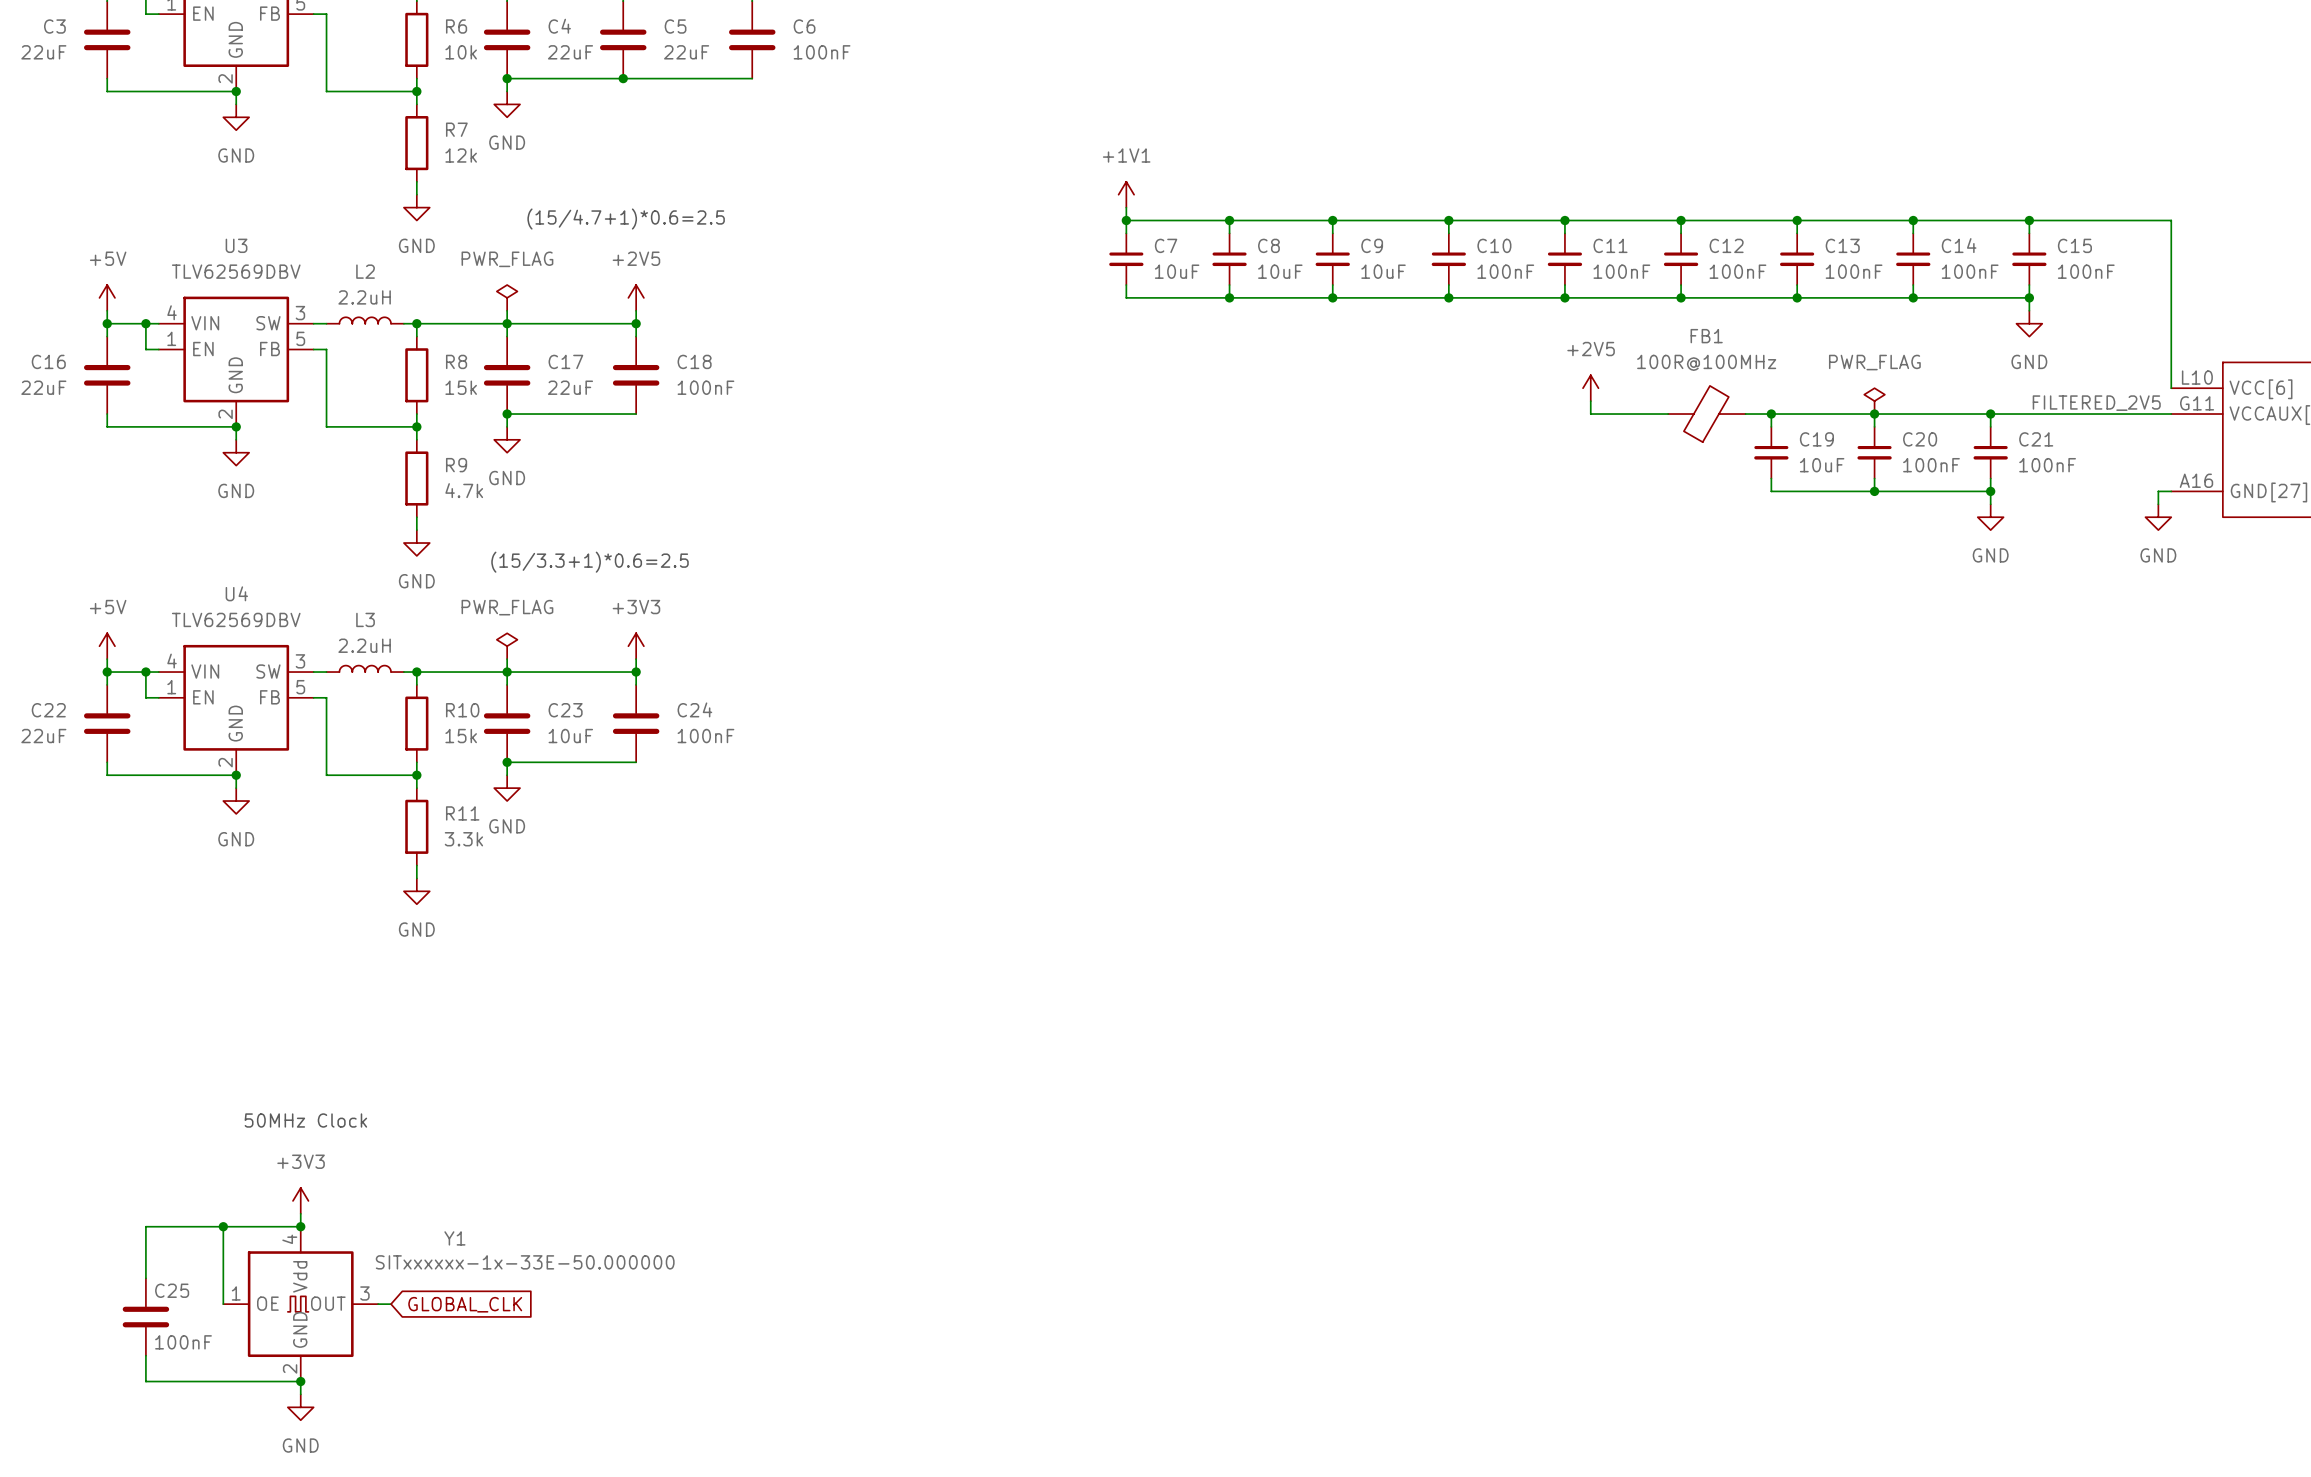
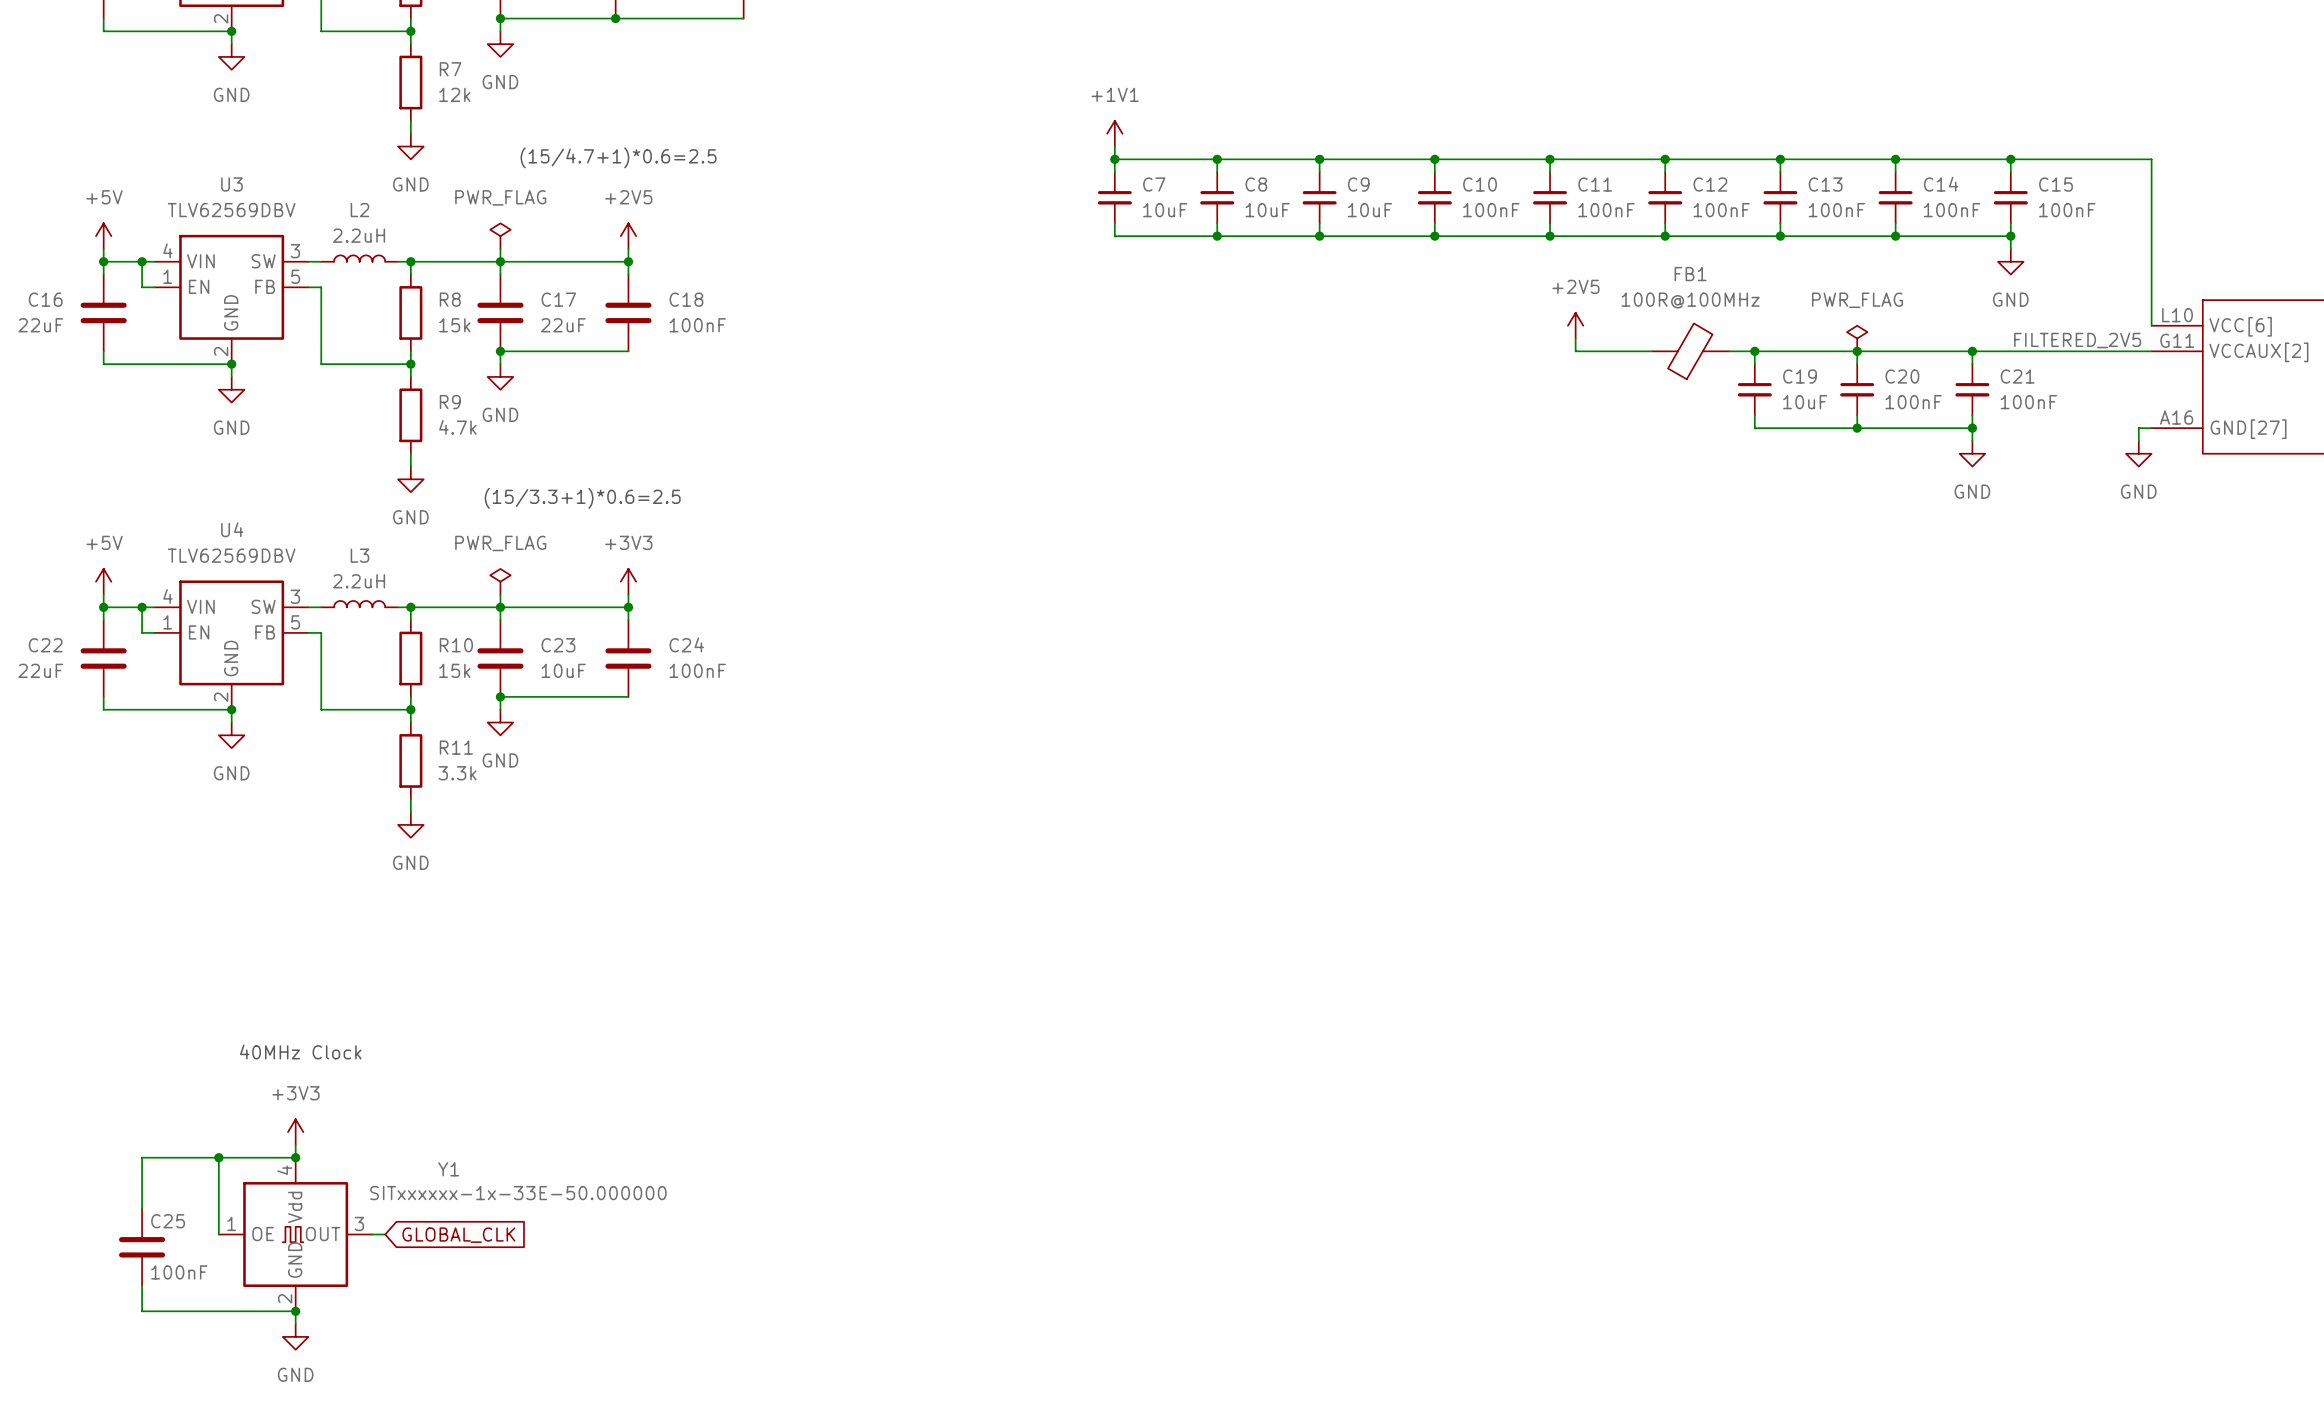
text: 50MHz Clock (305, 1120) -> 40MHz Clock (300, 1052)

